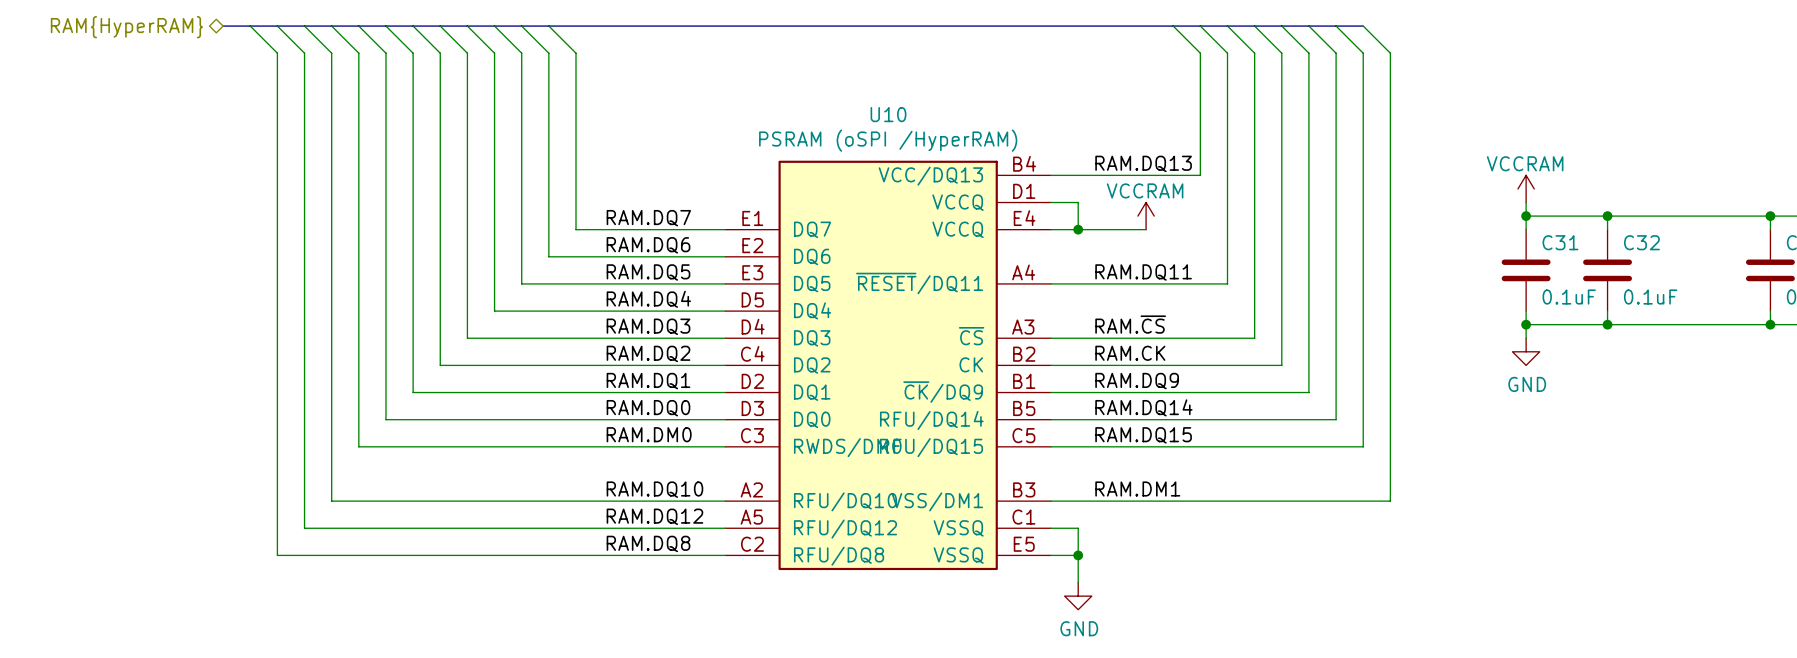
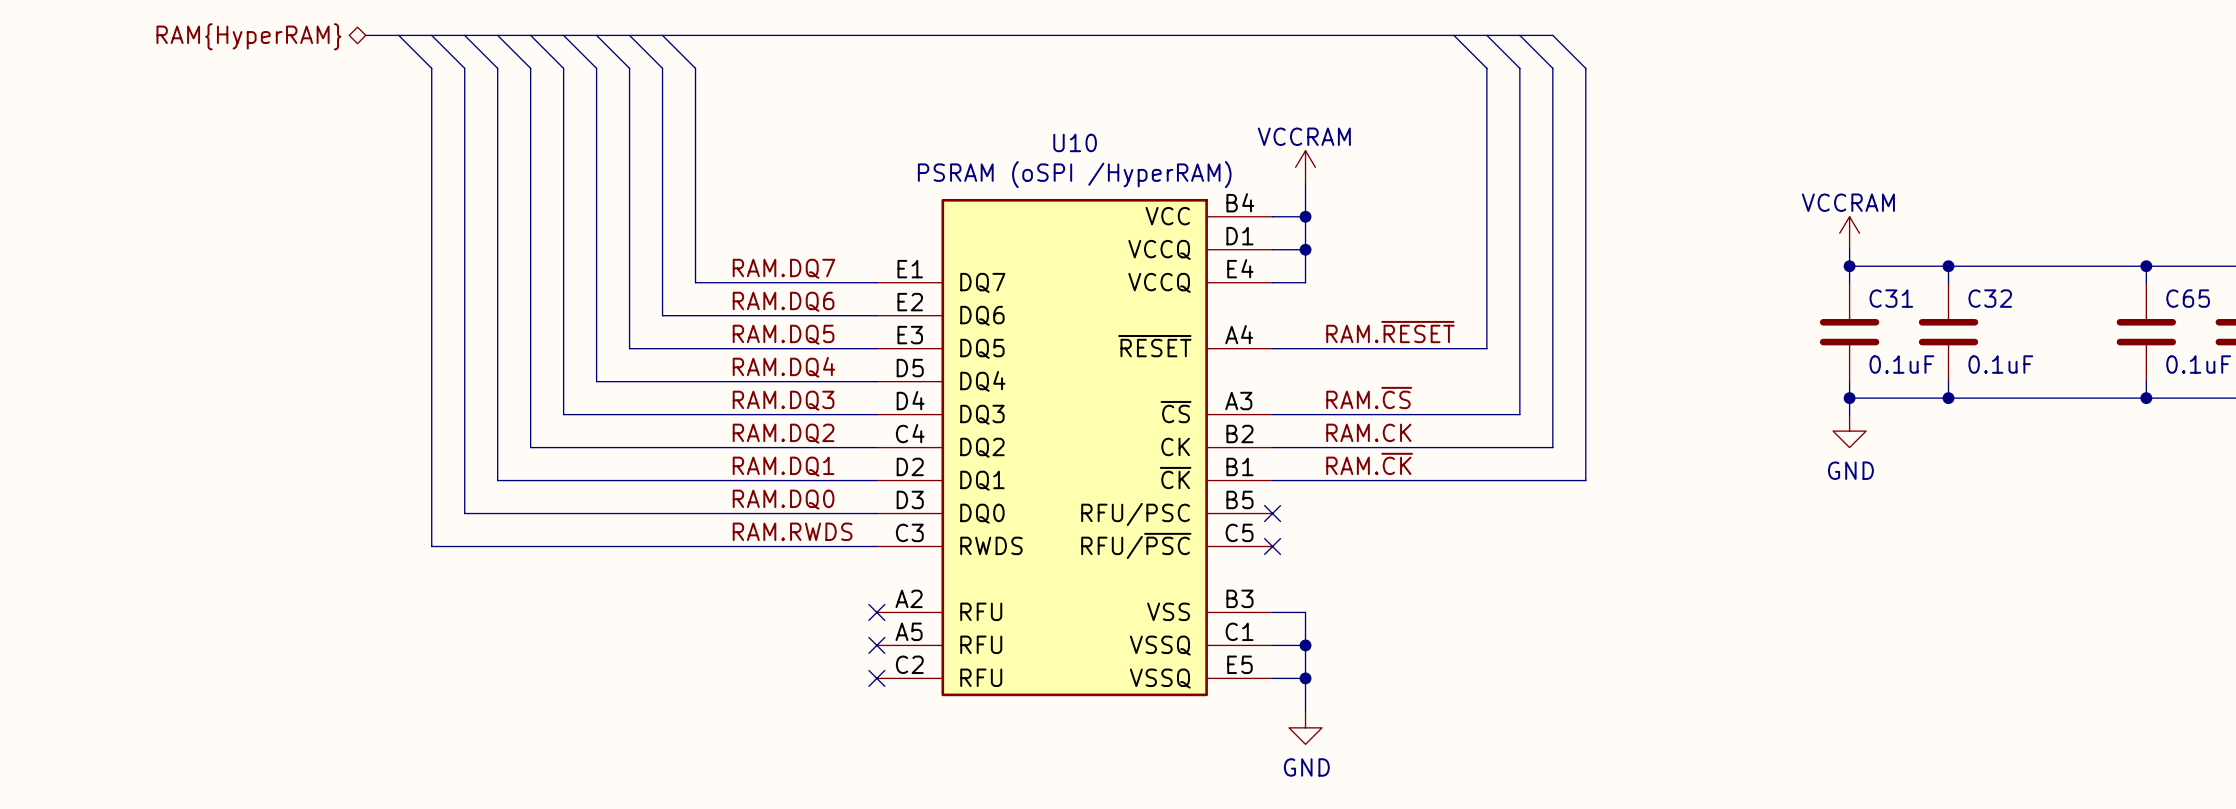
bus: (223, 26) (304, 26) -> none
wire: (250, 26) (277, 53) (277, 555) (725, 555) -> none
wire: (277, 26) (304, 53) (304, 528) (725, 528) -> none
wire: (304, 26) (331, 53) (331, 501) (725, 501) -> none
wire: (1173, 26) (1200, 53) (1200, 175) (1078, 175) -> none
bus: (1281, 26) (1363, 26) -> none
wire: (1308, 26) (1336, 53) (1336, 419) (1051, 419) -> none
wire: (1336, 26) (1363, 53) (1363, 446) (1051, 446) -> none
wire: (1363, 26) (1390, 53) (1390, 501) (1078, 501) -> (1305, 645) (1305, 612)
hierarchical label position: RAM{HyperRAM} (126, 27) -> RAM{HyperRAM} (248, 36)
wire: none -> (1305, 183) (1305, 249)
U10 symbol: [725, 160, 1052, 571] -> [876, 198, 1273, 697]
label: RAM.DQ13 (1143, 163) -> none
junction: none -> (1305, 216)
junction: none -> (1305, 249)
power symbol position: VCCRAM (1146, 216) -> VCCRAM (1305, 167)
wire: (1078, 229) (1146, 229) -> none
junction: (1078, 229) -> none
label: RAM.DQ11 (1143, 272) -> RAM.~{RESET} (1390, 332)
label: RAM.DQ9 (1137, 381) -> RAM.~{CK} (1369, 463)
label: RAM.DQ14 (1143, 407) -> none
no-connect mark: none -> (1272, 513)
label: RAM.DM0 (649, 434) -> RAM.RWDS (792, 531)
label: RAM.DQ15 (1143, 435) -> none
no-connect mark: none -> (1272, 546)
label: RAM.DQ10 (654, 489) -> none
label: RAM.DM1 (1137, 489) -> none
no-connect mark: none -> (876, 612)
label: RAM.DQ12 (654, 516) -> none
no-connect mark: none -> (876, 645)
junction: none -> (1305, 645)
label: RAM.DQ8 (648, 543) -> none
no-connect mark: none -> (876, 678)

